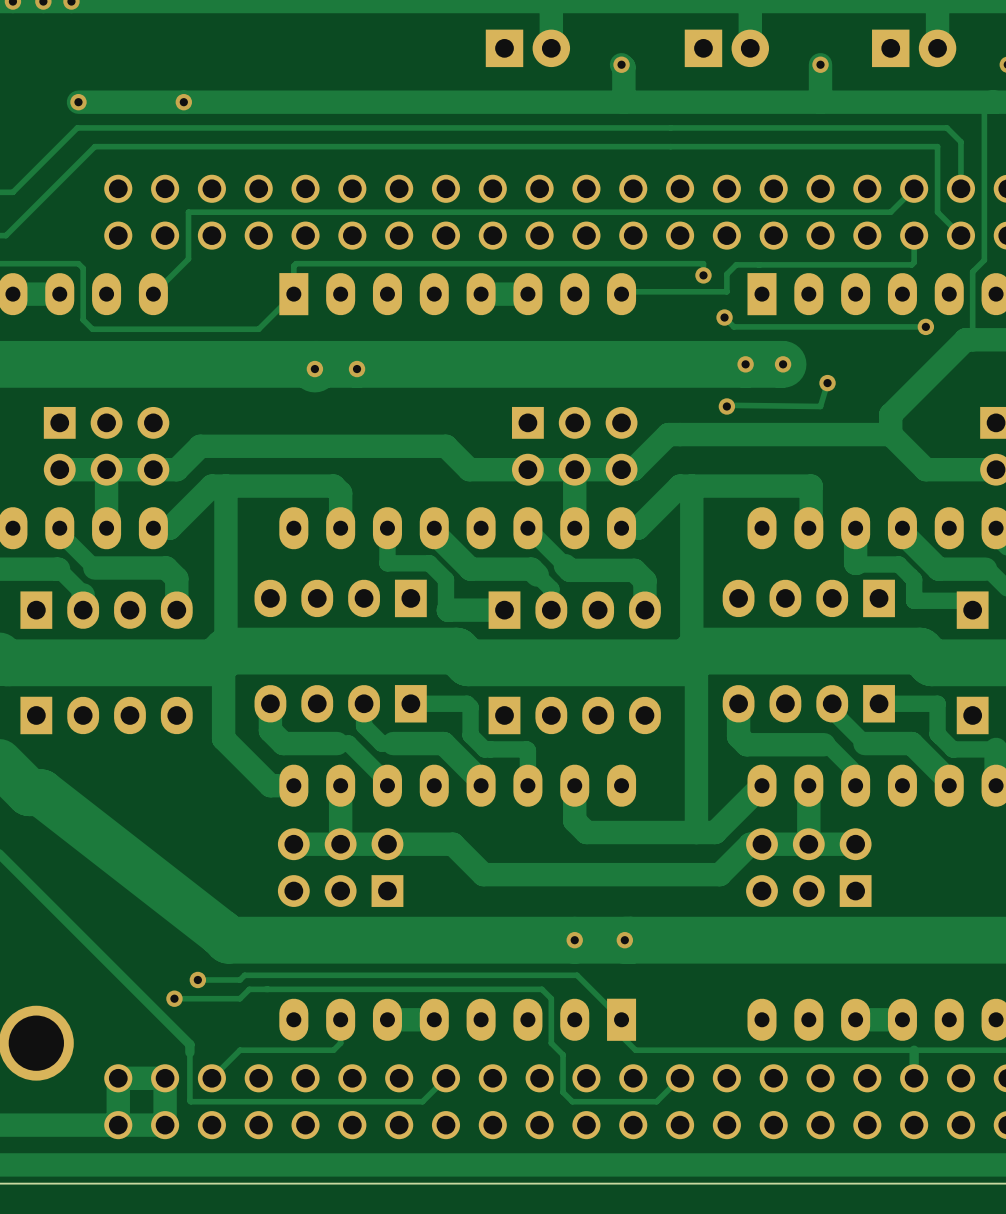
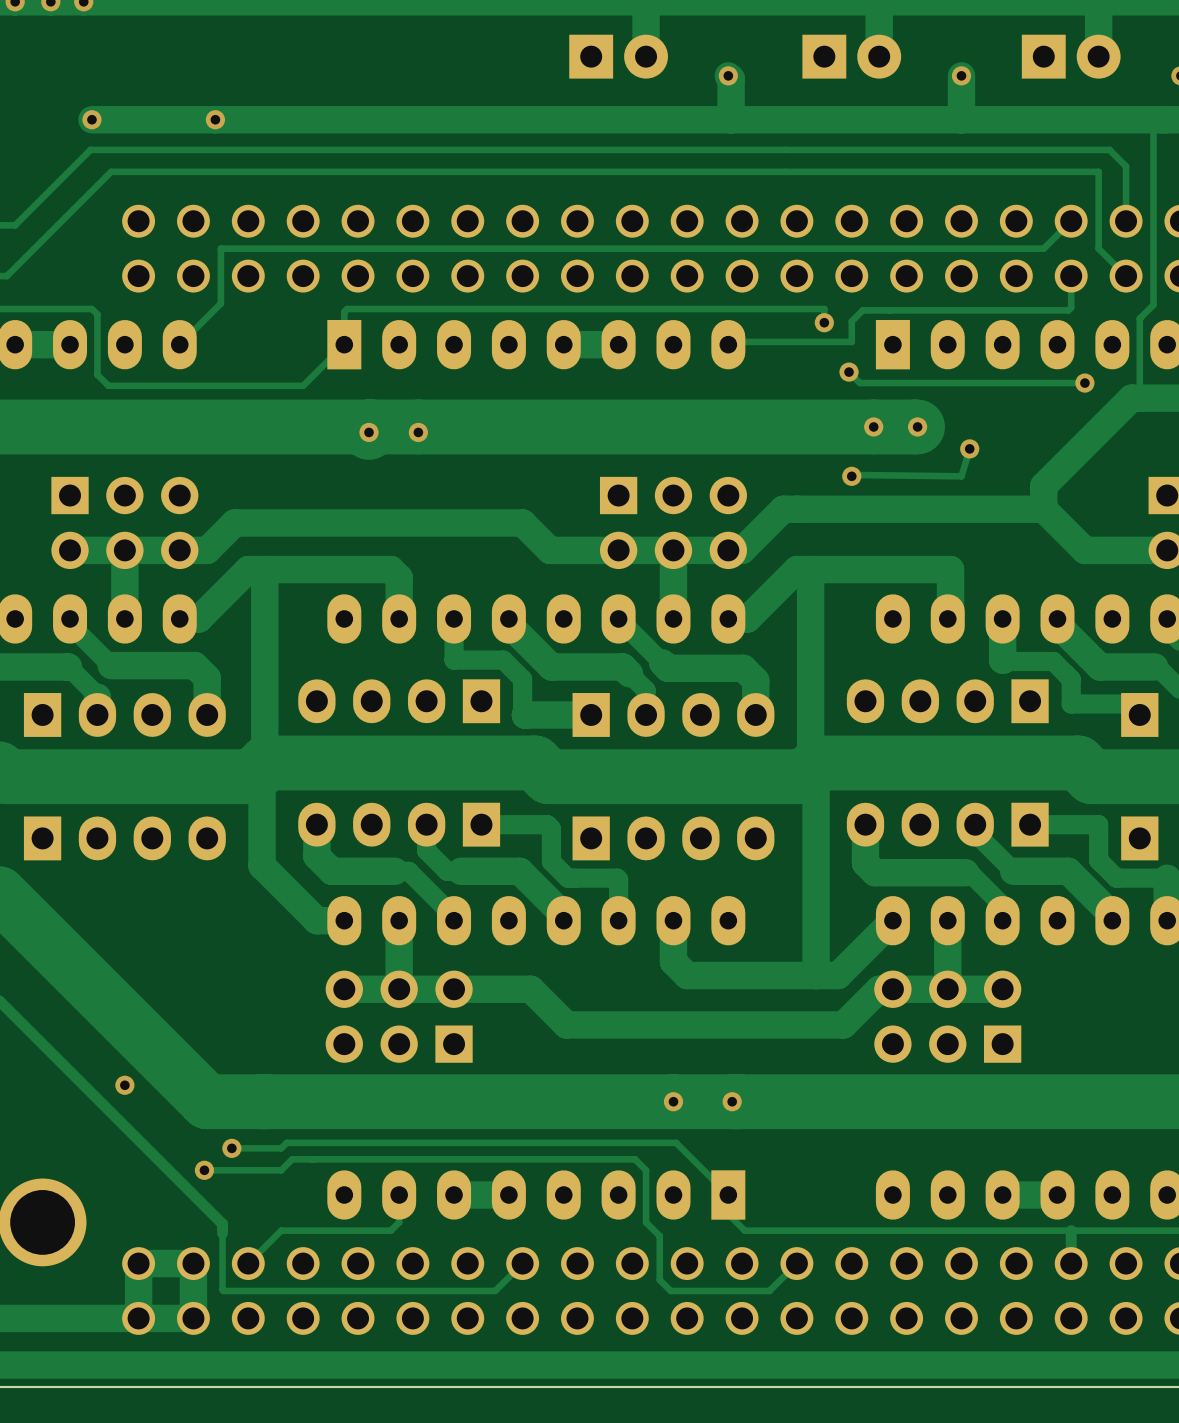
track: (29, 792) (41, 792) (228, 940) -> (34, 928) (207, 1101) (267, 1101)
via: none -> (124, 1085)

